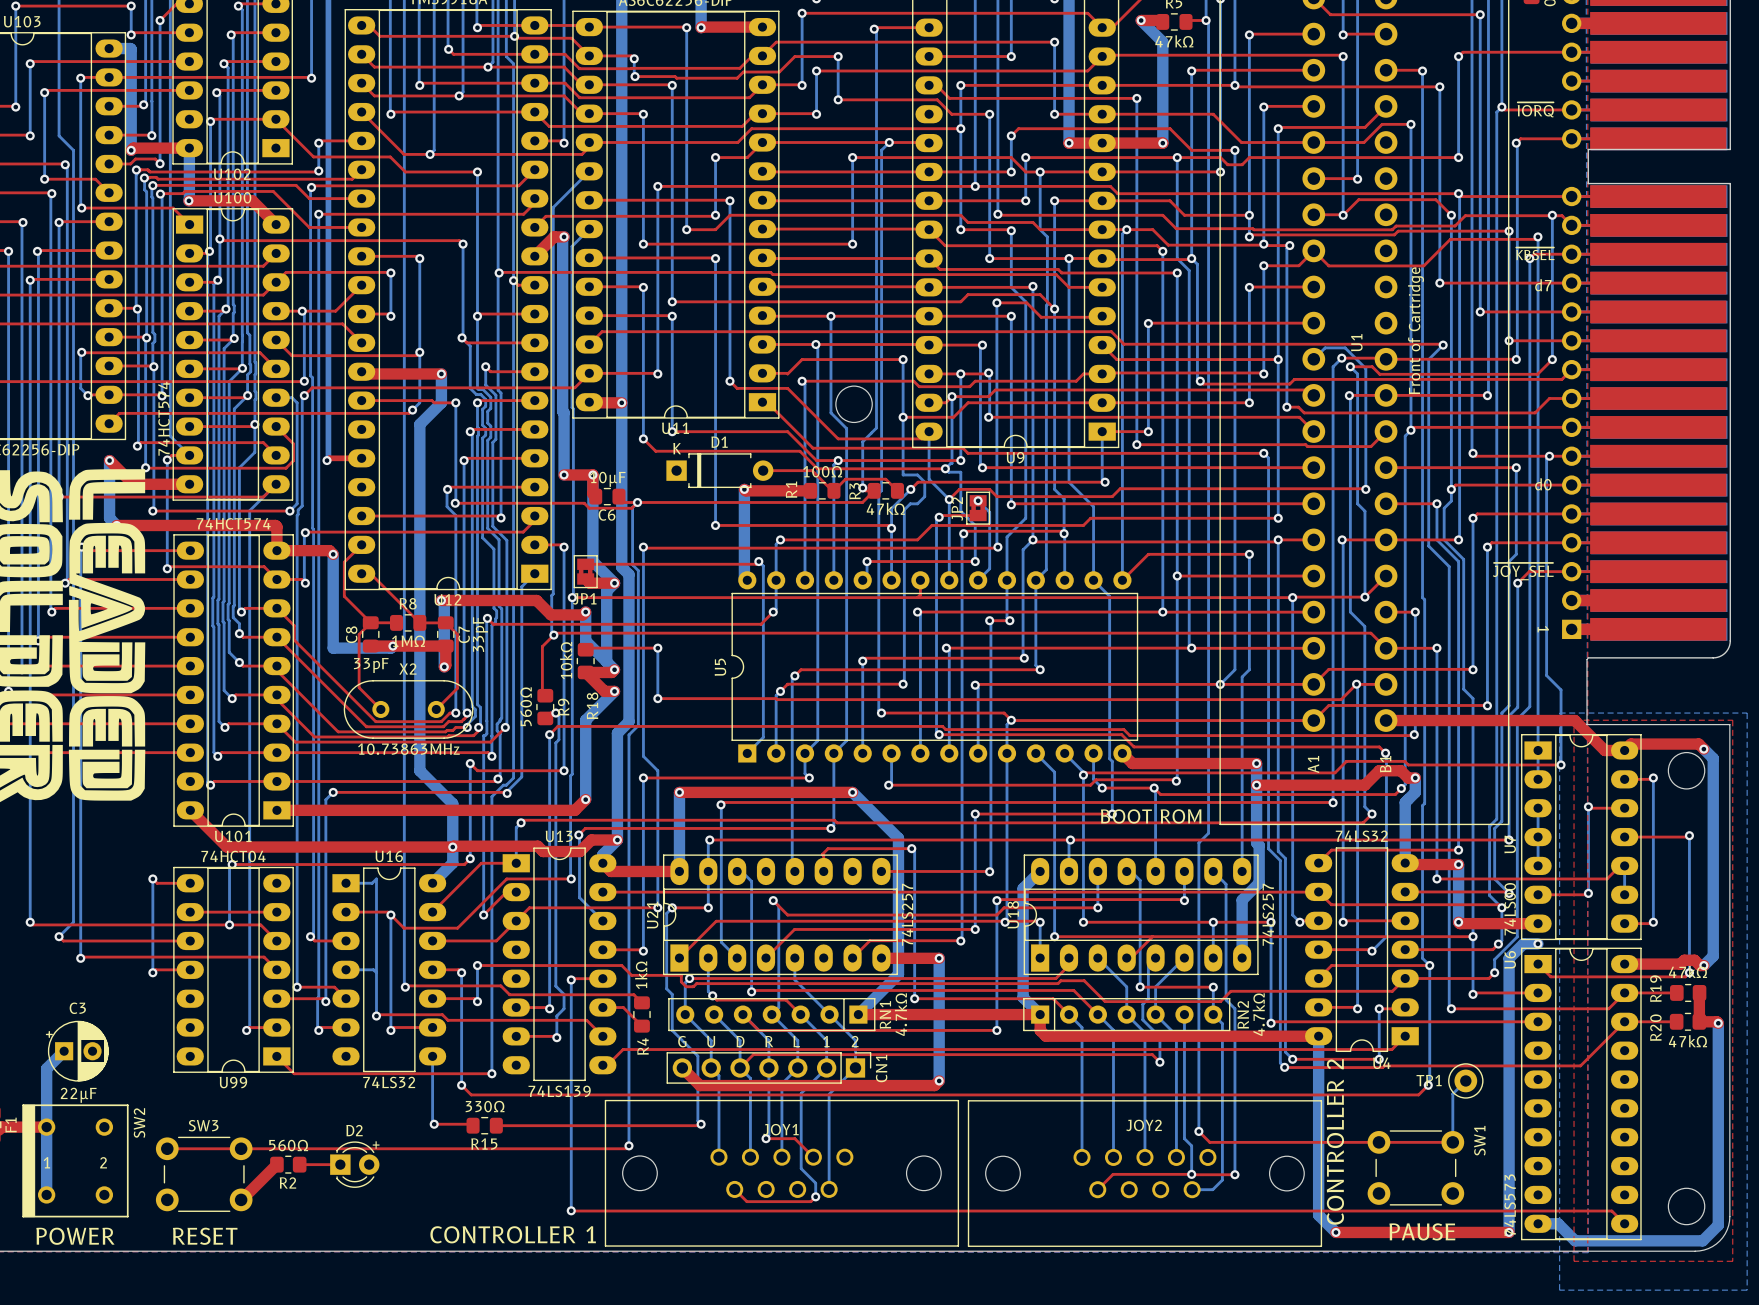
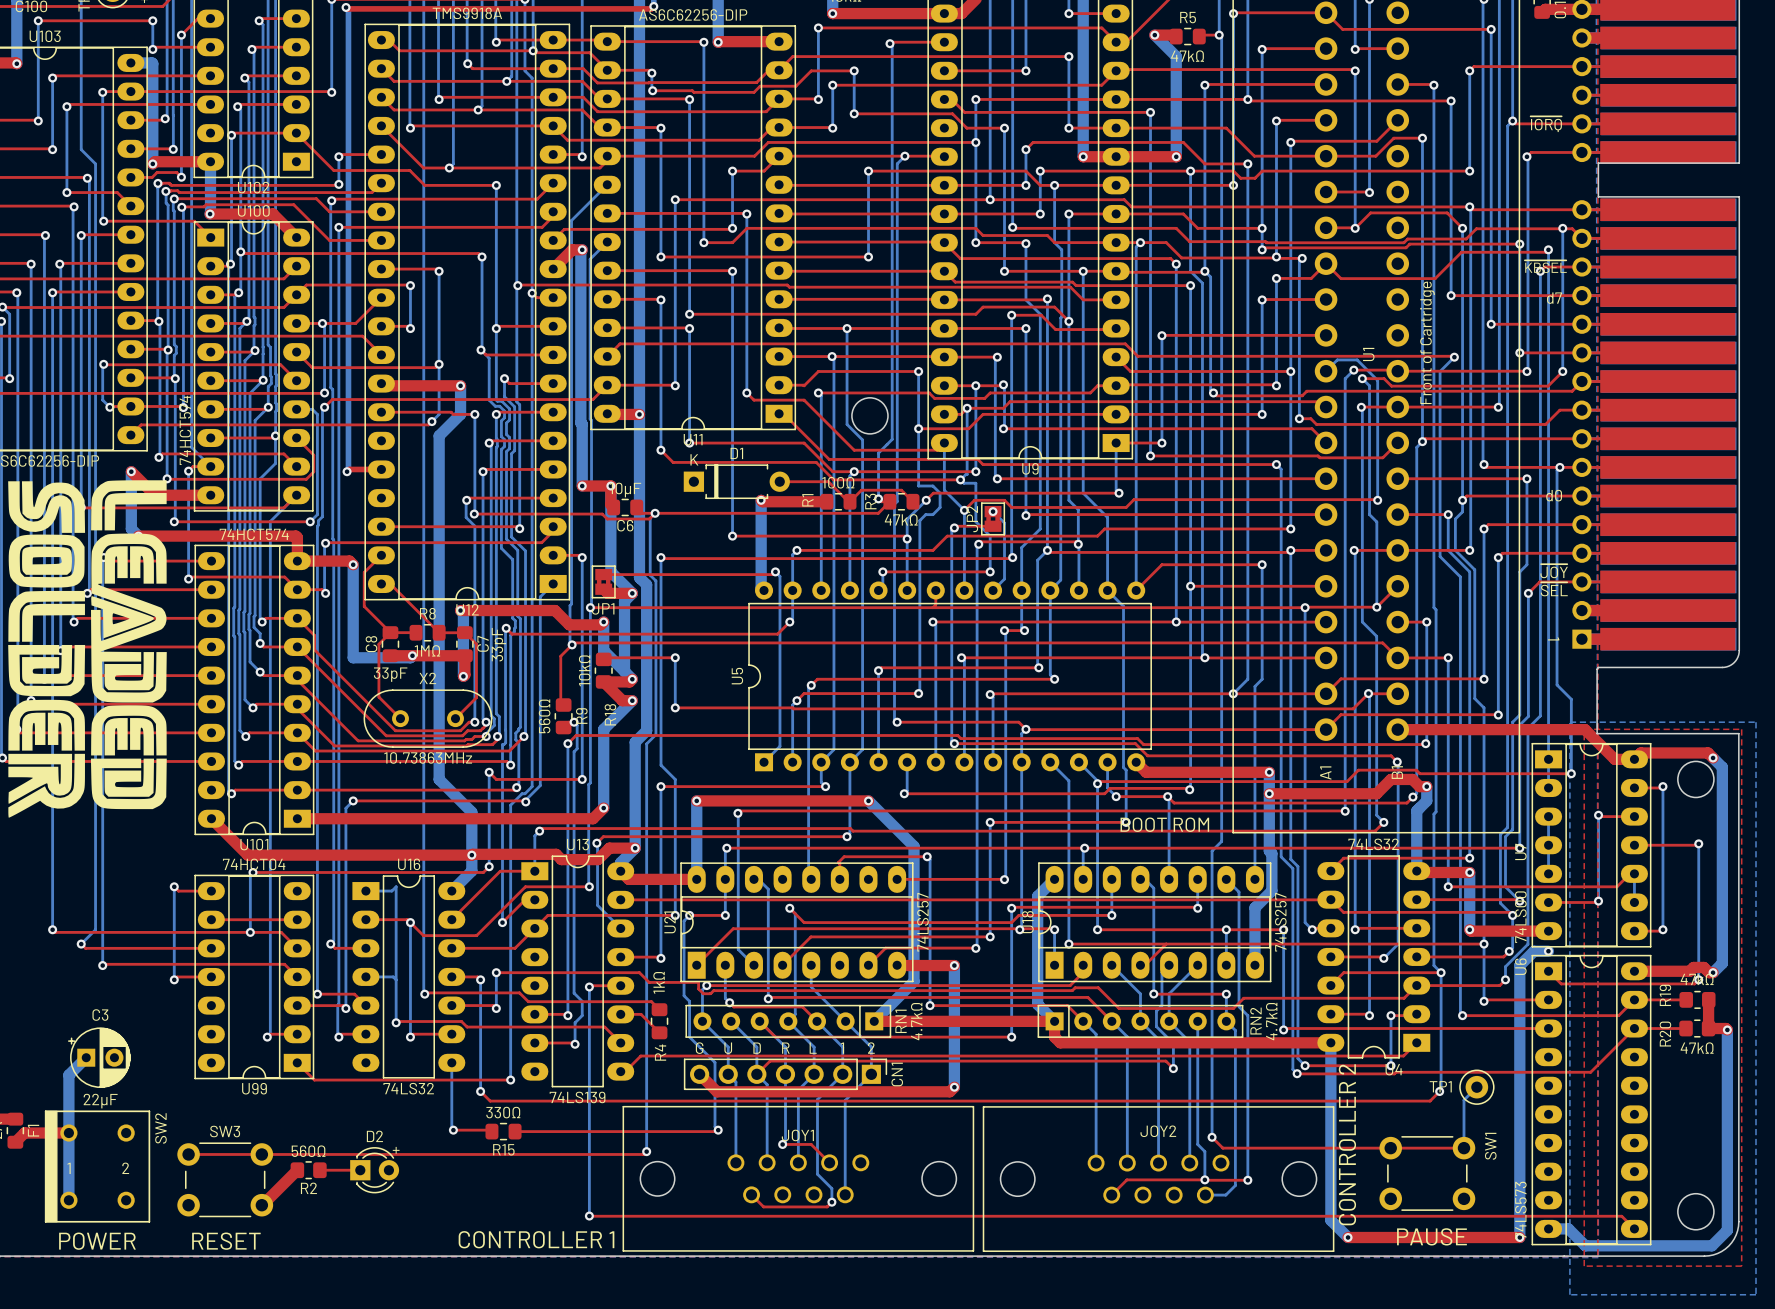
text: none -> ~{JOY} (1554, 571)
text: ~{JOY_SEL} (1523, 571) -> none
text: none -> ~{SEL} (1554, 589)

